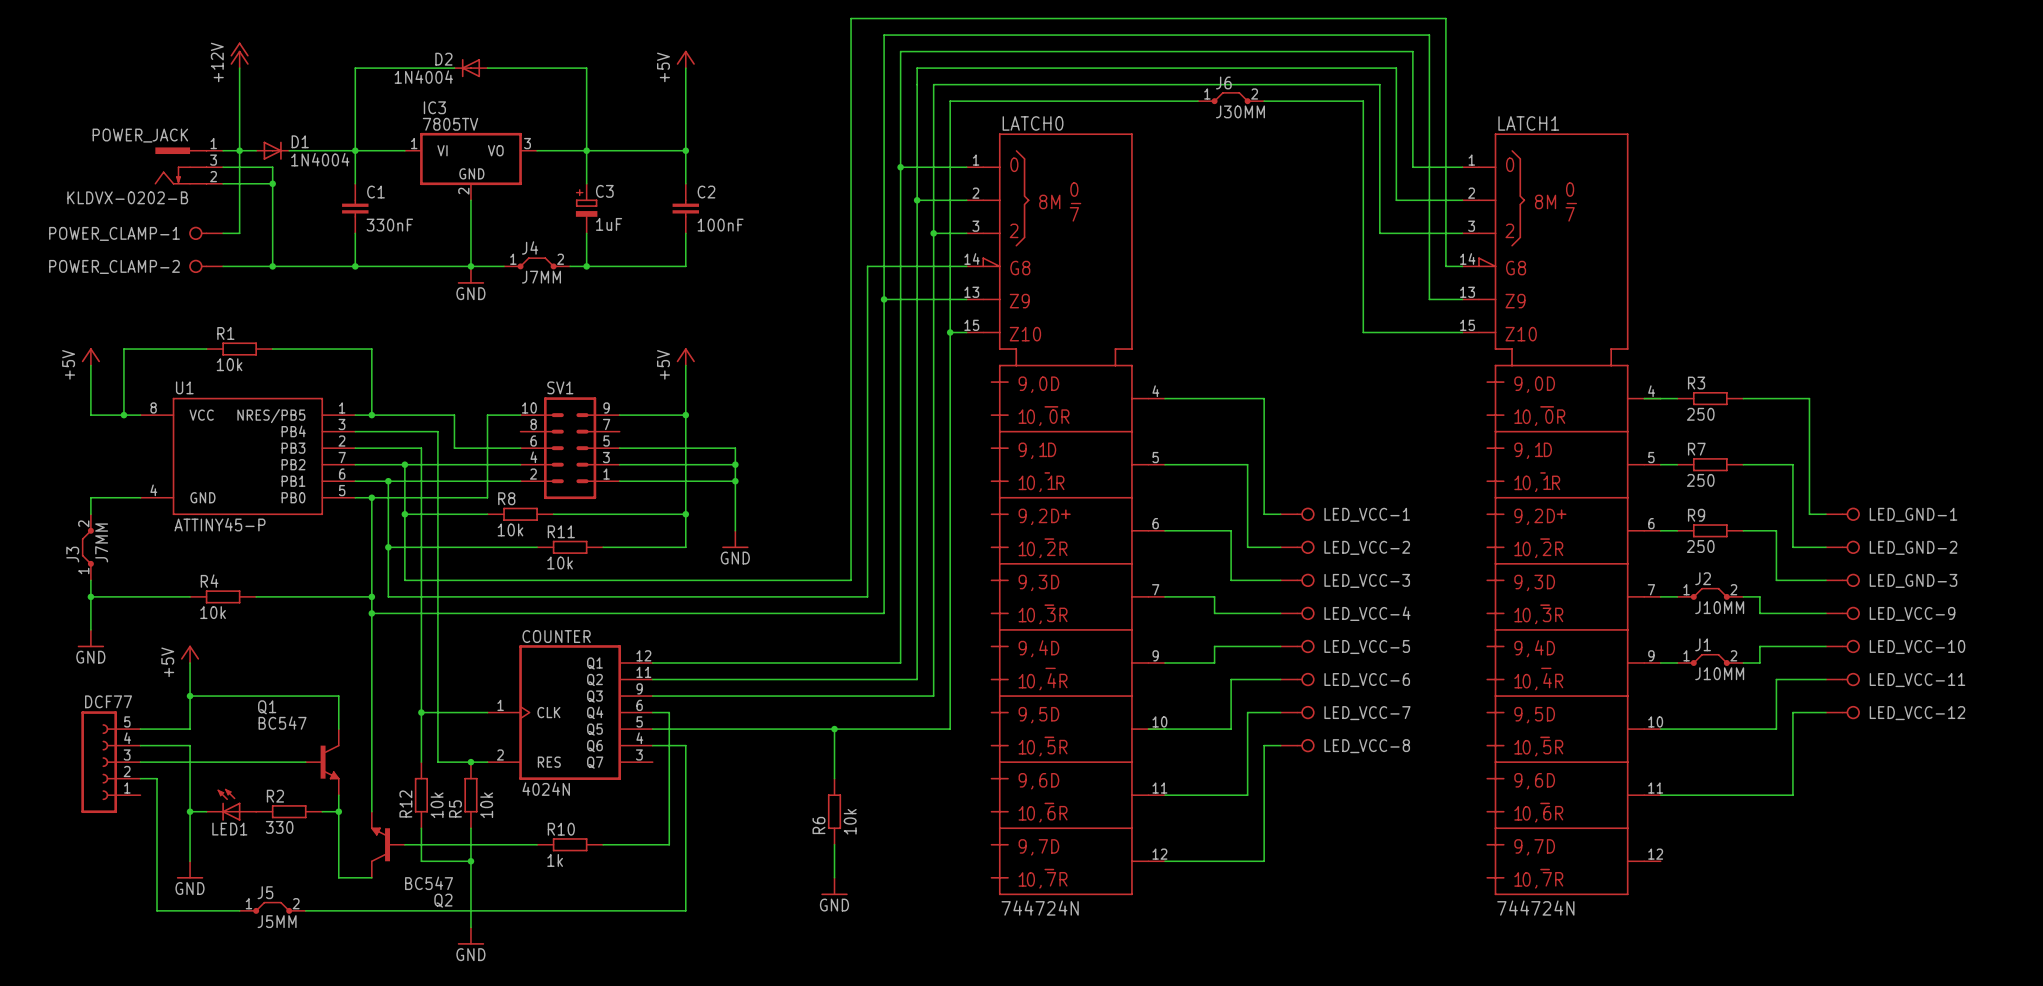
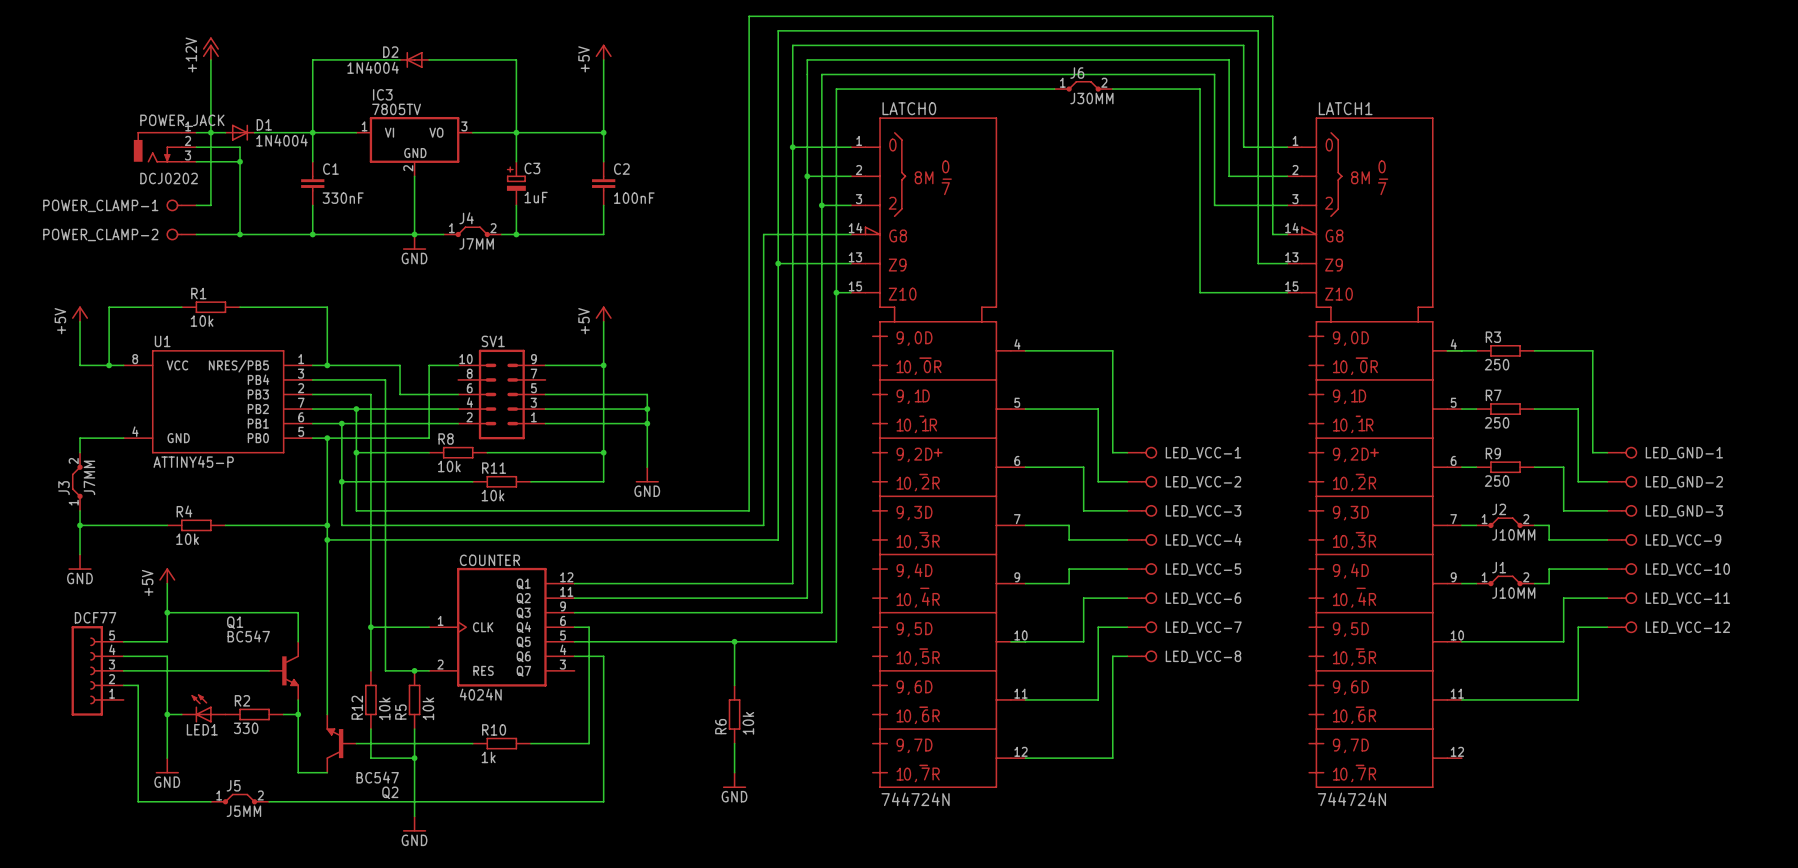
POWER_JACK name position: POWER_JACK (140, 135) -> POWER_JACK (182, 120)
POWER_JACK symbol: [154, 147, 224, 185] -> [133, 132, 197, 163]
POWER_JACK value: KLDVX-0202-B (127, 197) -> DCJ0202 (169, 178)

